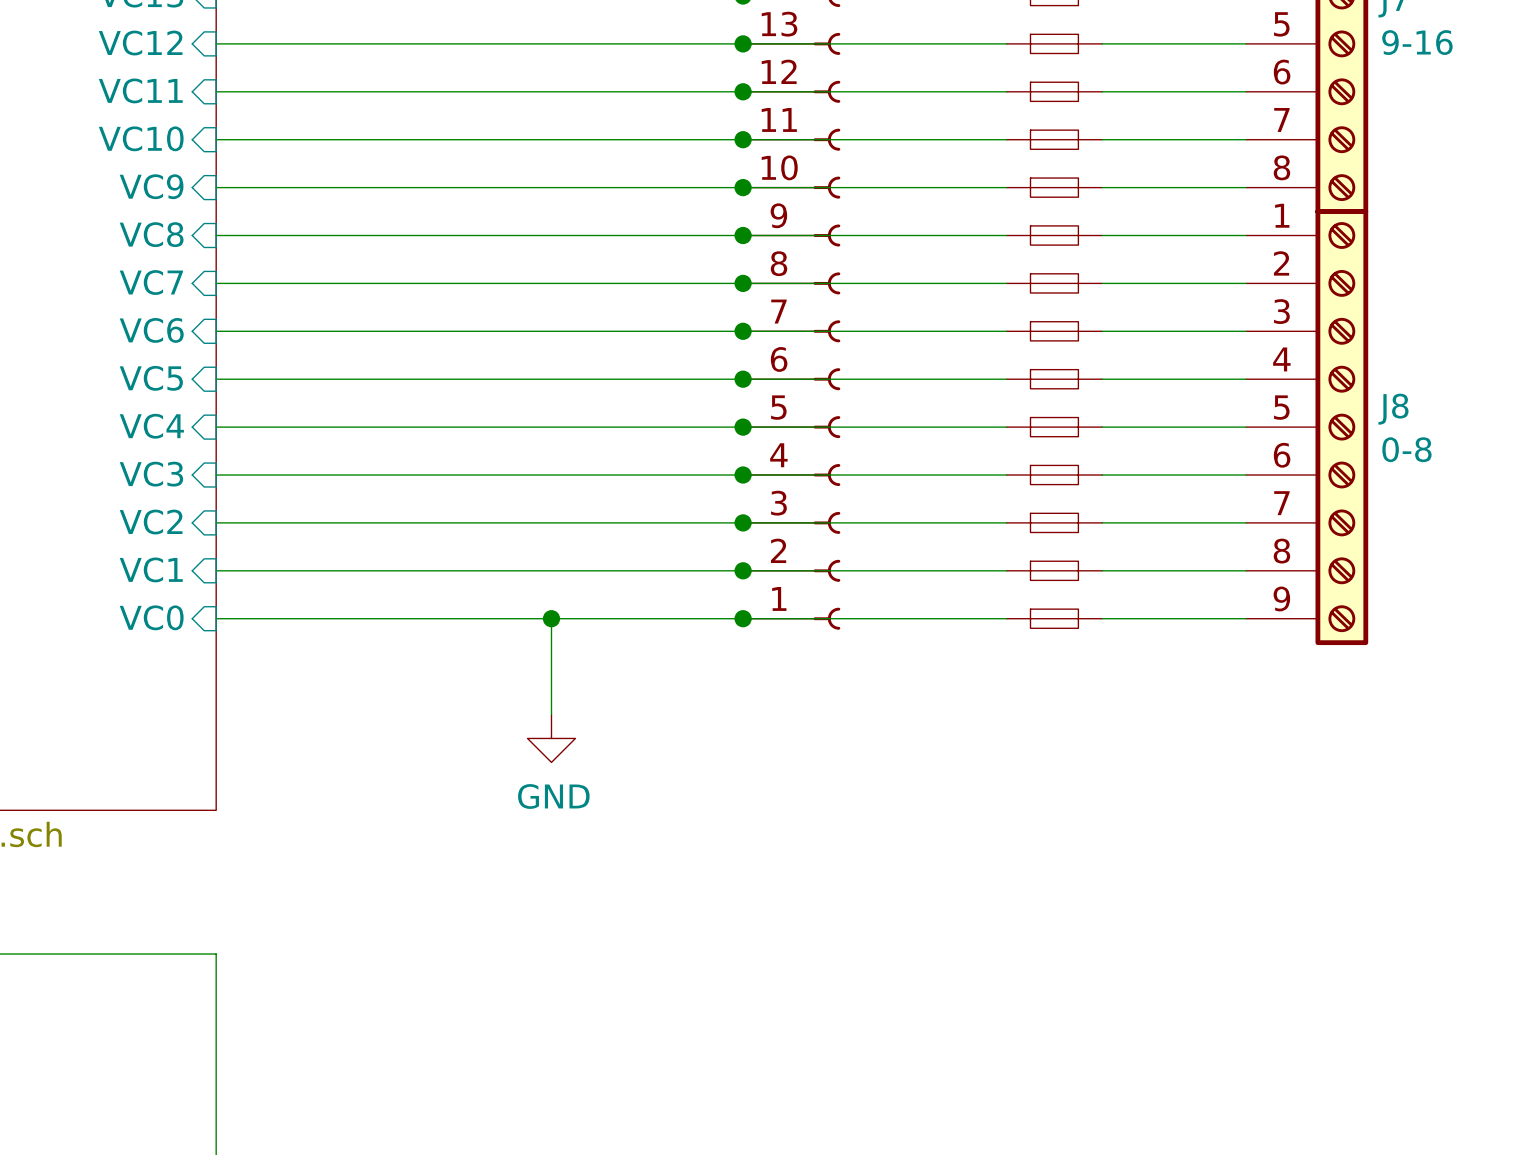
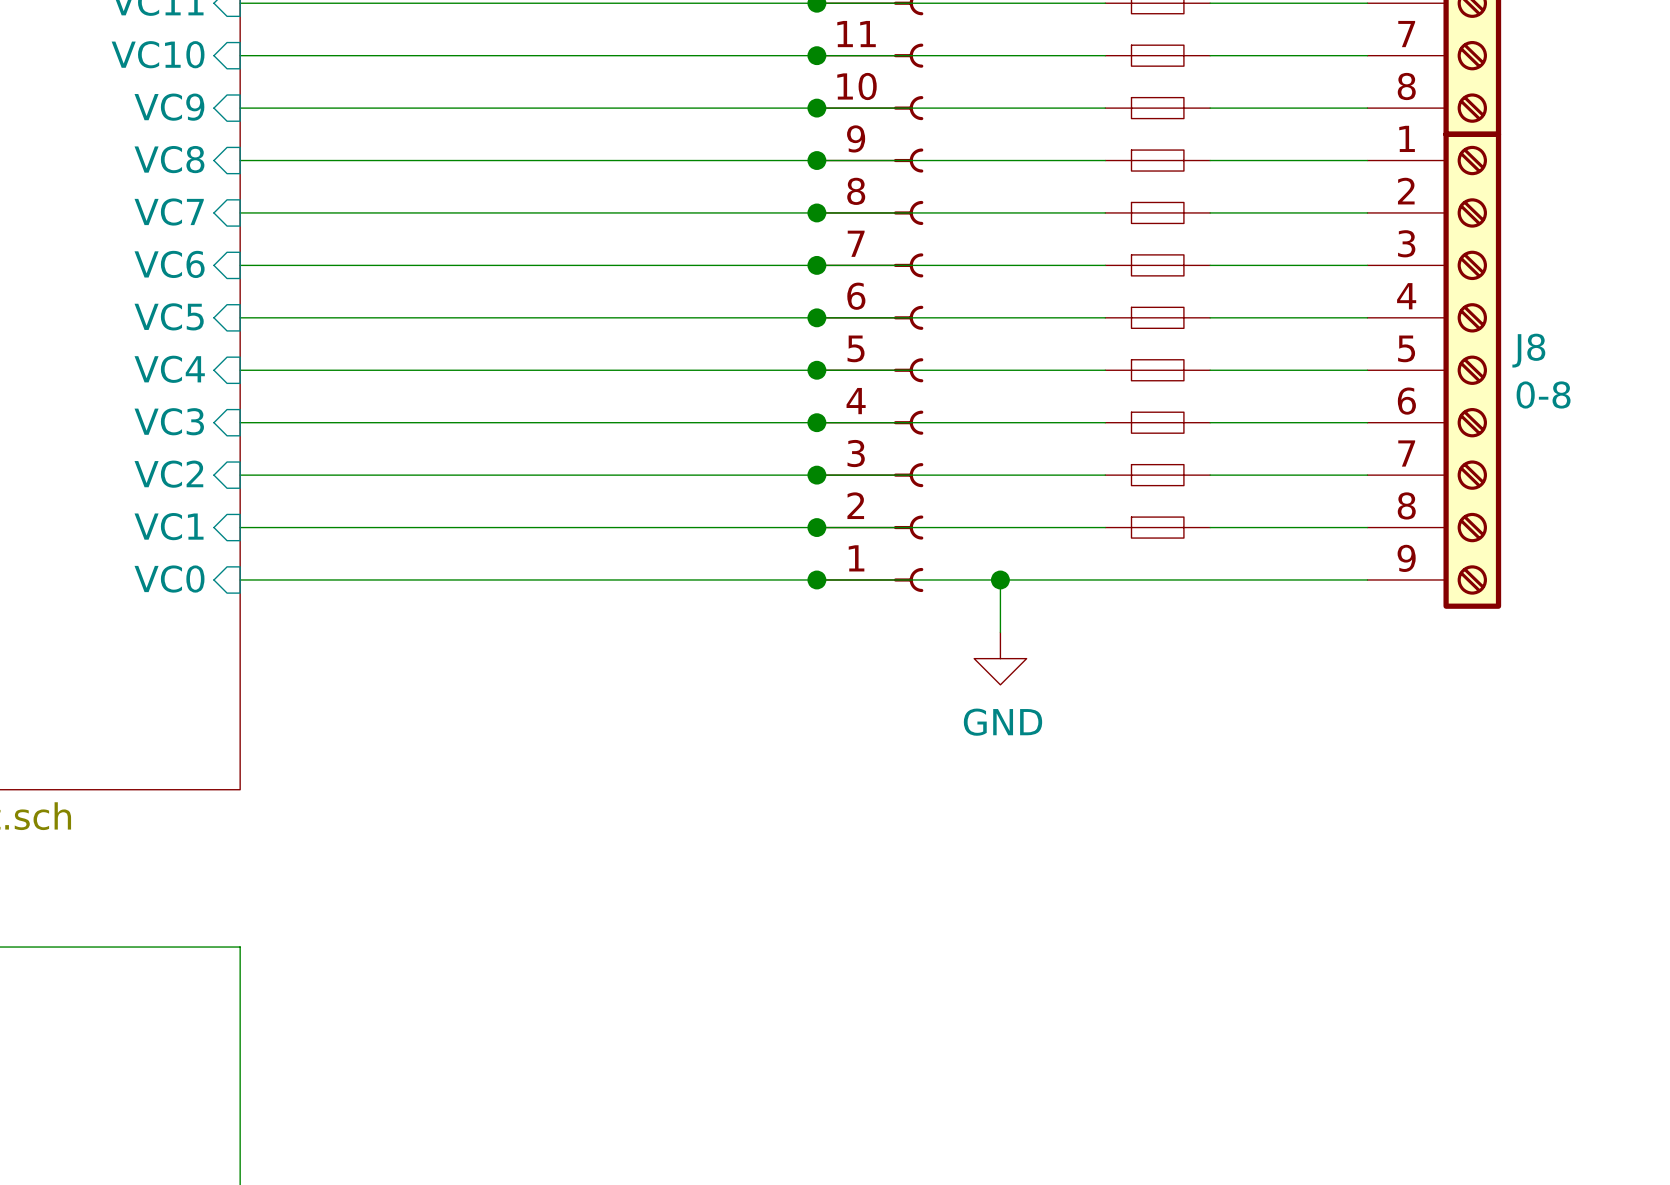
wire: (551, 618) (551, 714) -> none
junction: (551, 618) -> none
wire: none -> (1000, 579) (1000, 632)
junction: none -> (1000, 579)
part: (1054, 618) -> none
power symbol position: GND (551, 738) -> GND (1000, 658)

